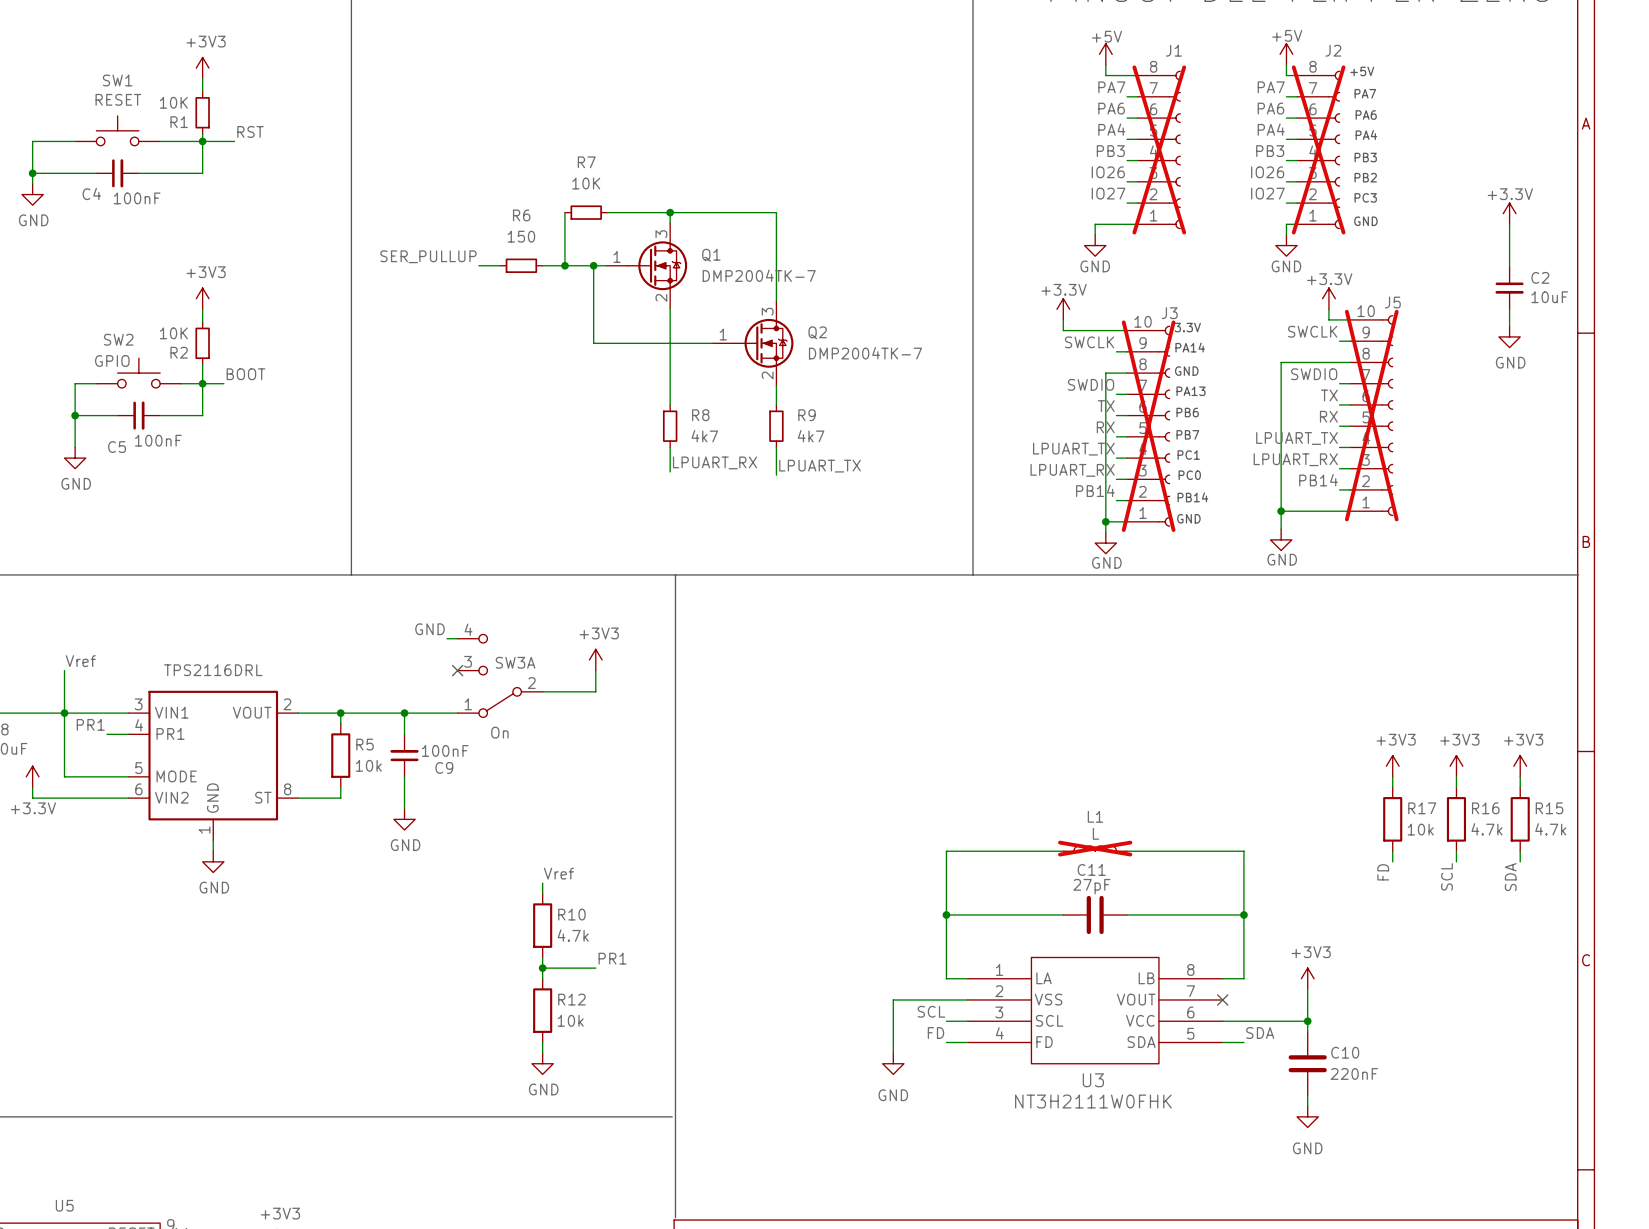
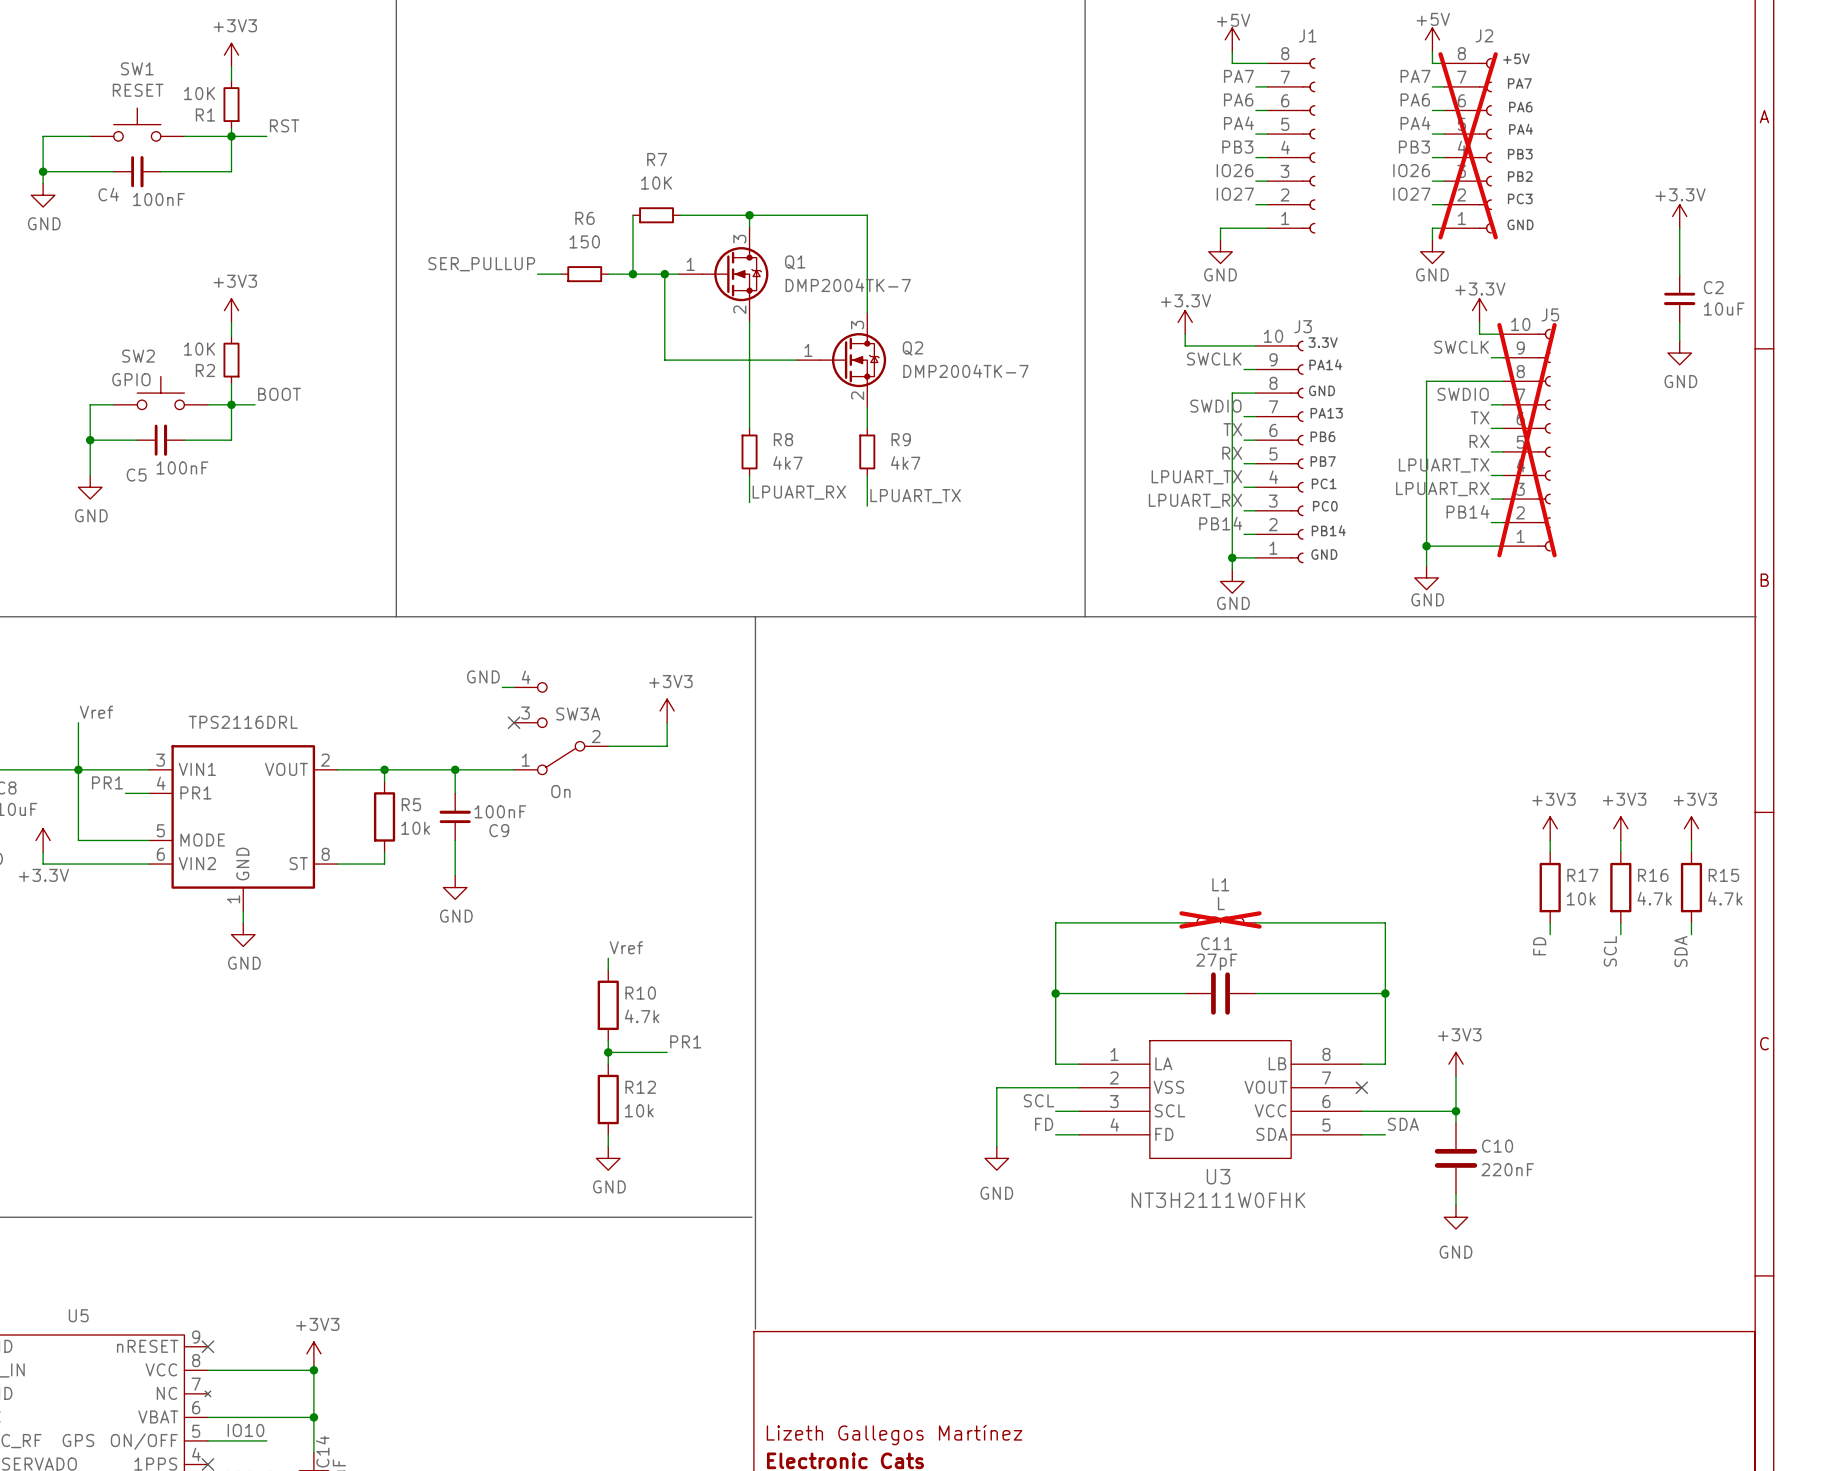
J1 do-not-place cross: (1159, 149) -> none
J3 do-not-place cross: (1148, 426) -> none

